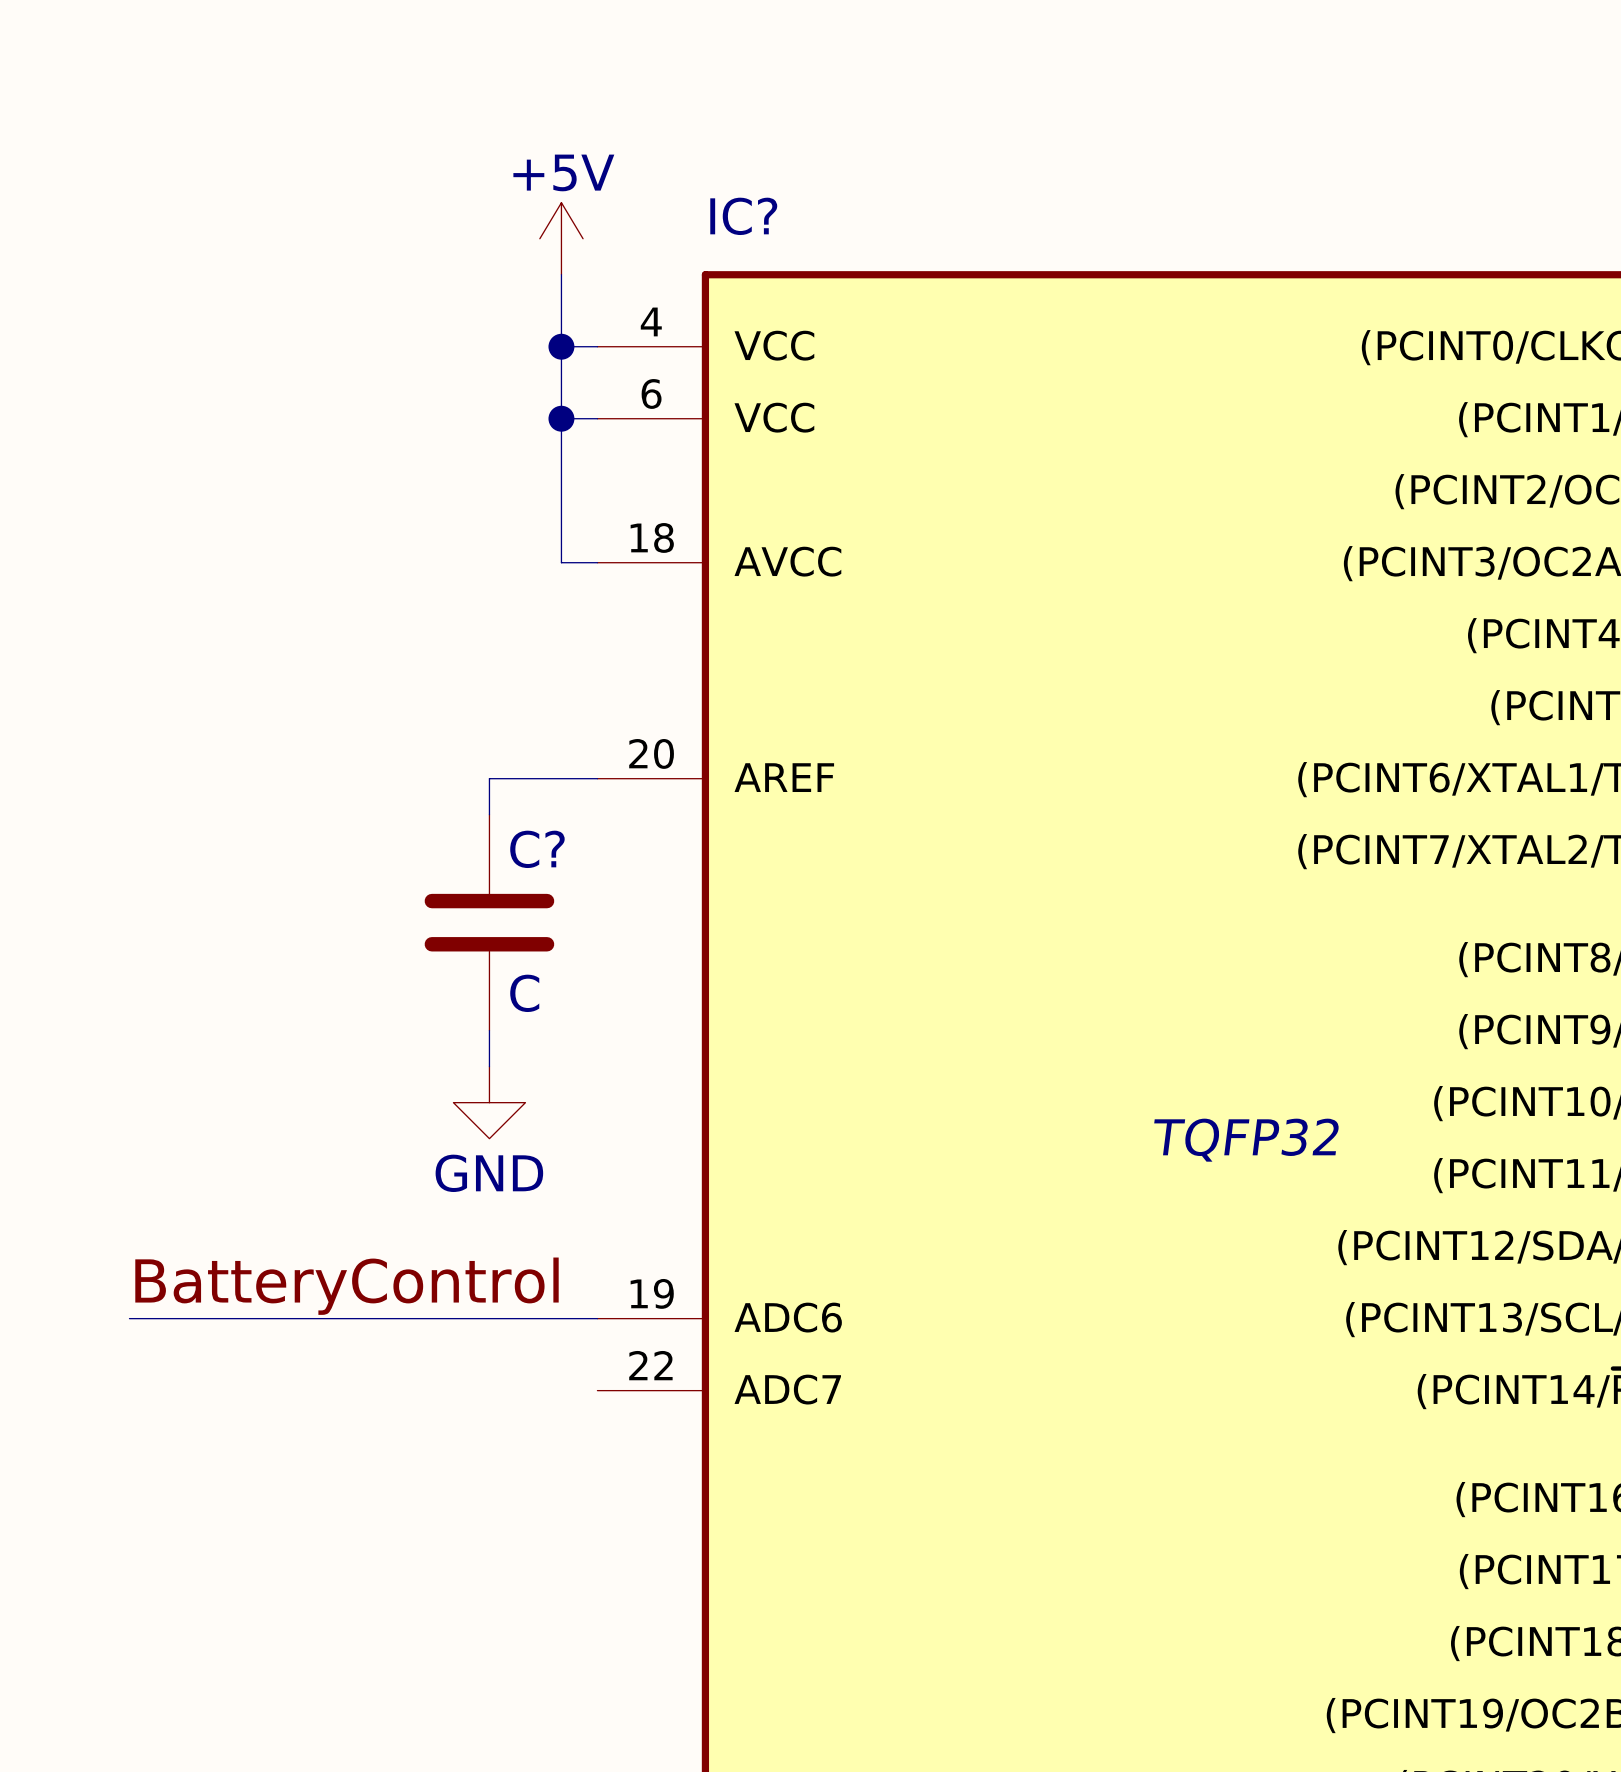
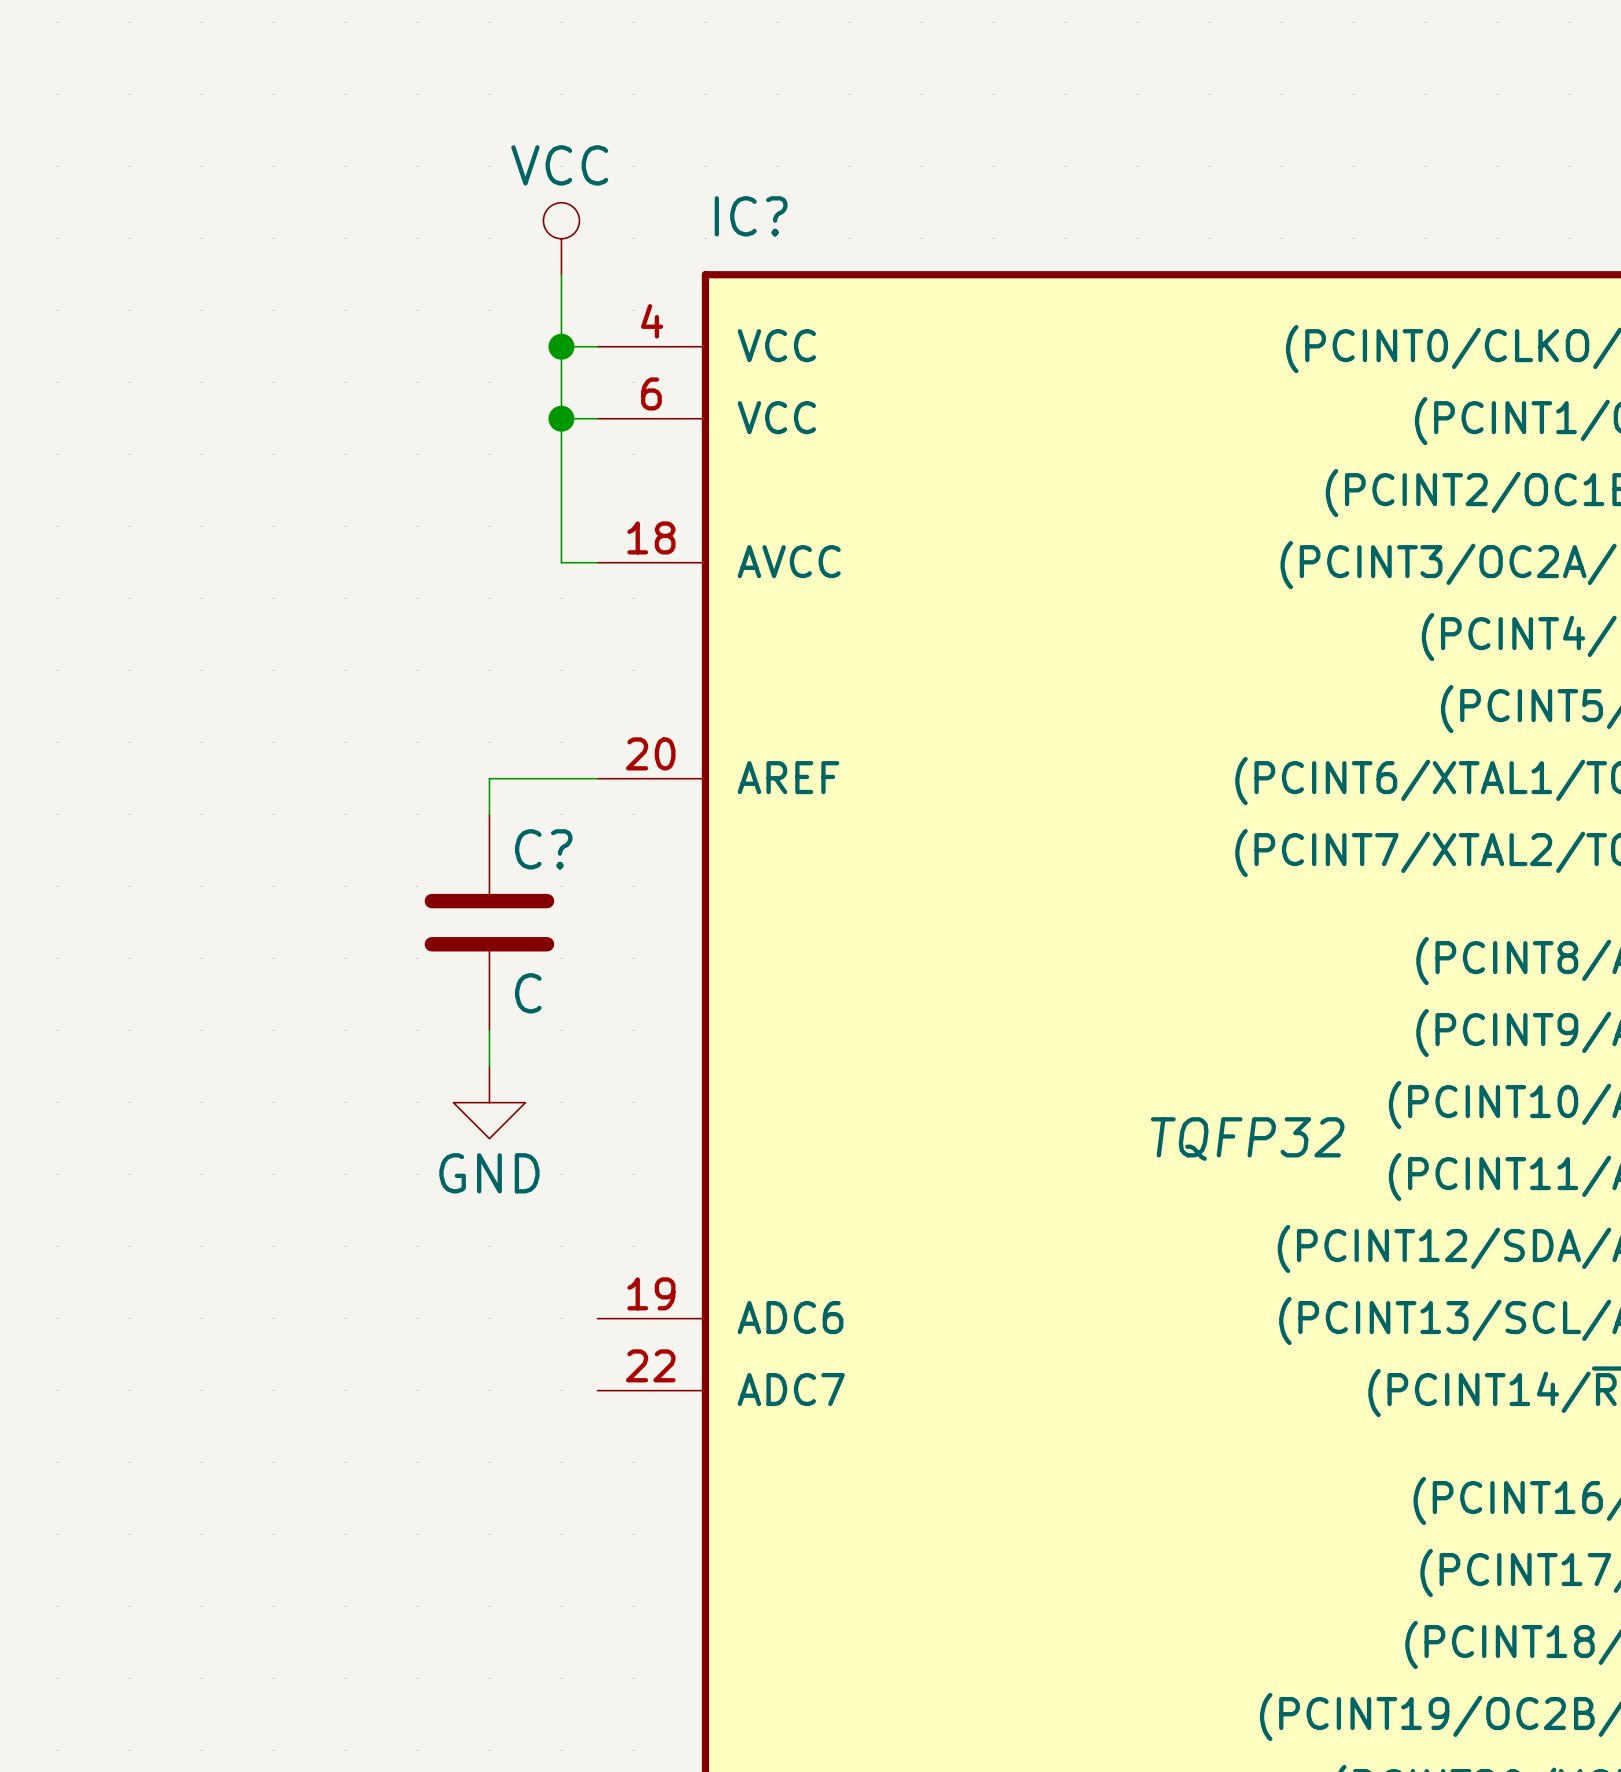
power symbol: +5V (561, 238) -> VCC (561, 238)
label: BatteryControl (346, 1286) -> none
wire: (129, 1318) (597, 1318) -> none

